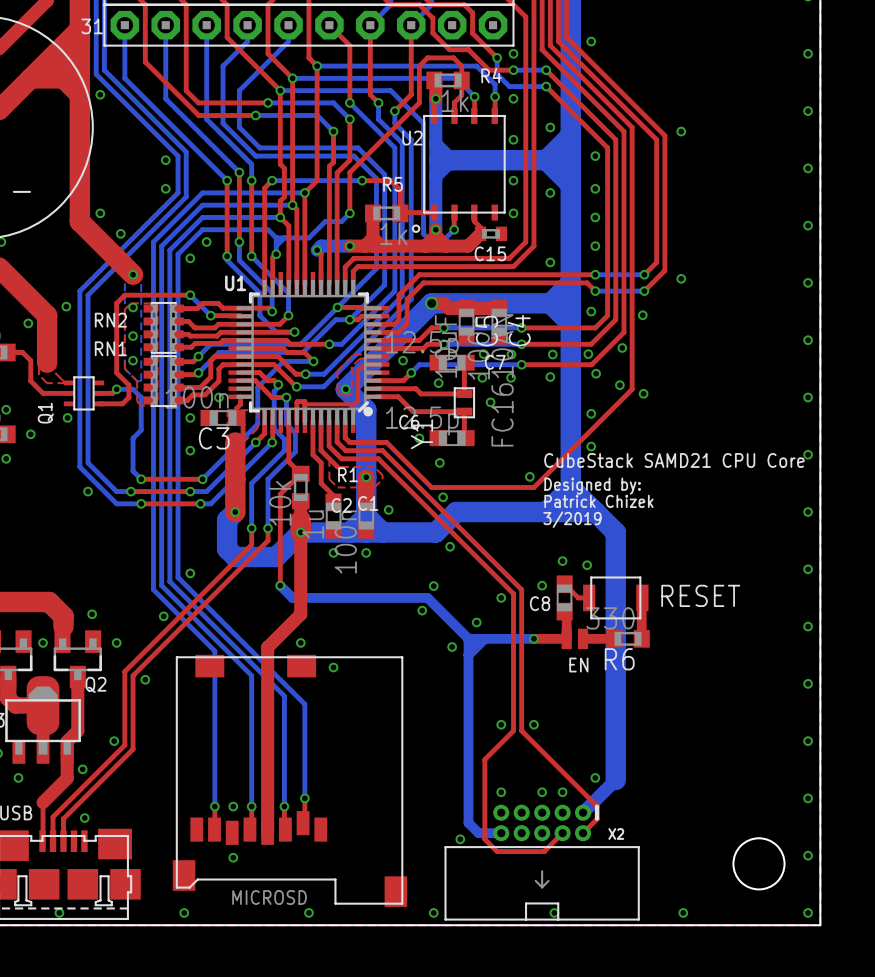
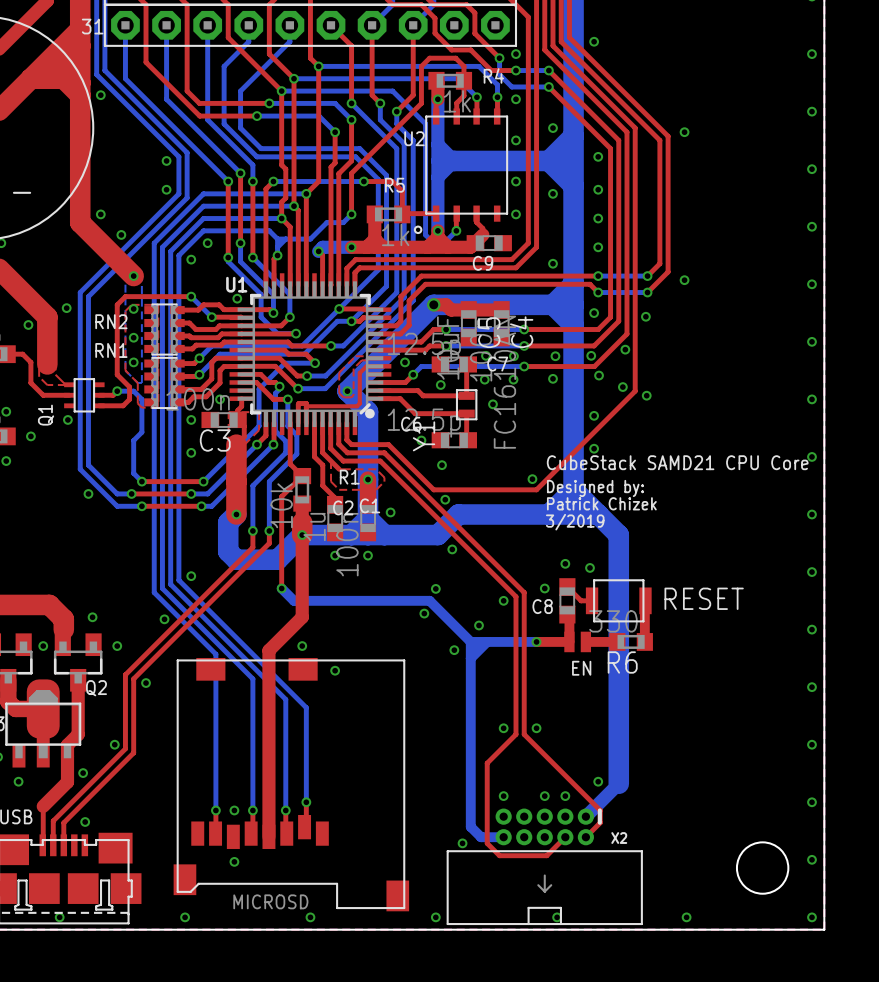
C15: (491, 233) -> none
C9: none -> (489, 243)
via: none -> (237, 298)

